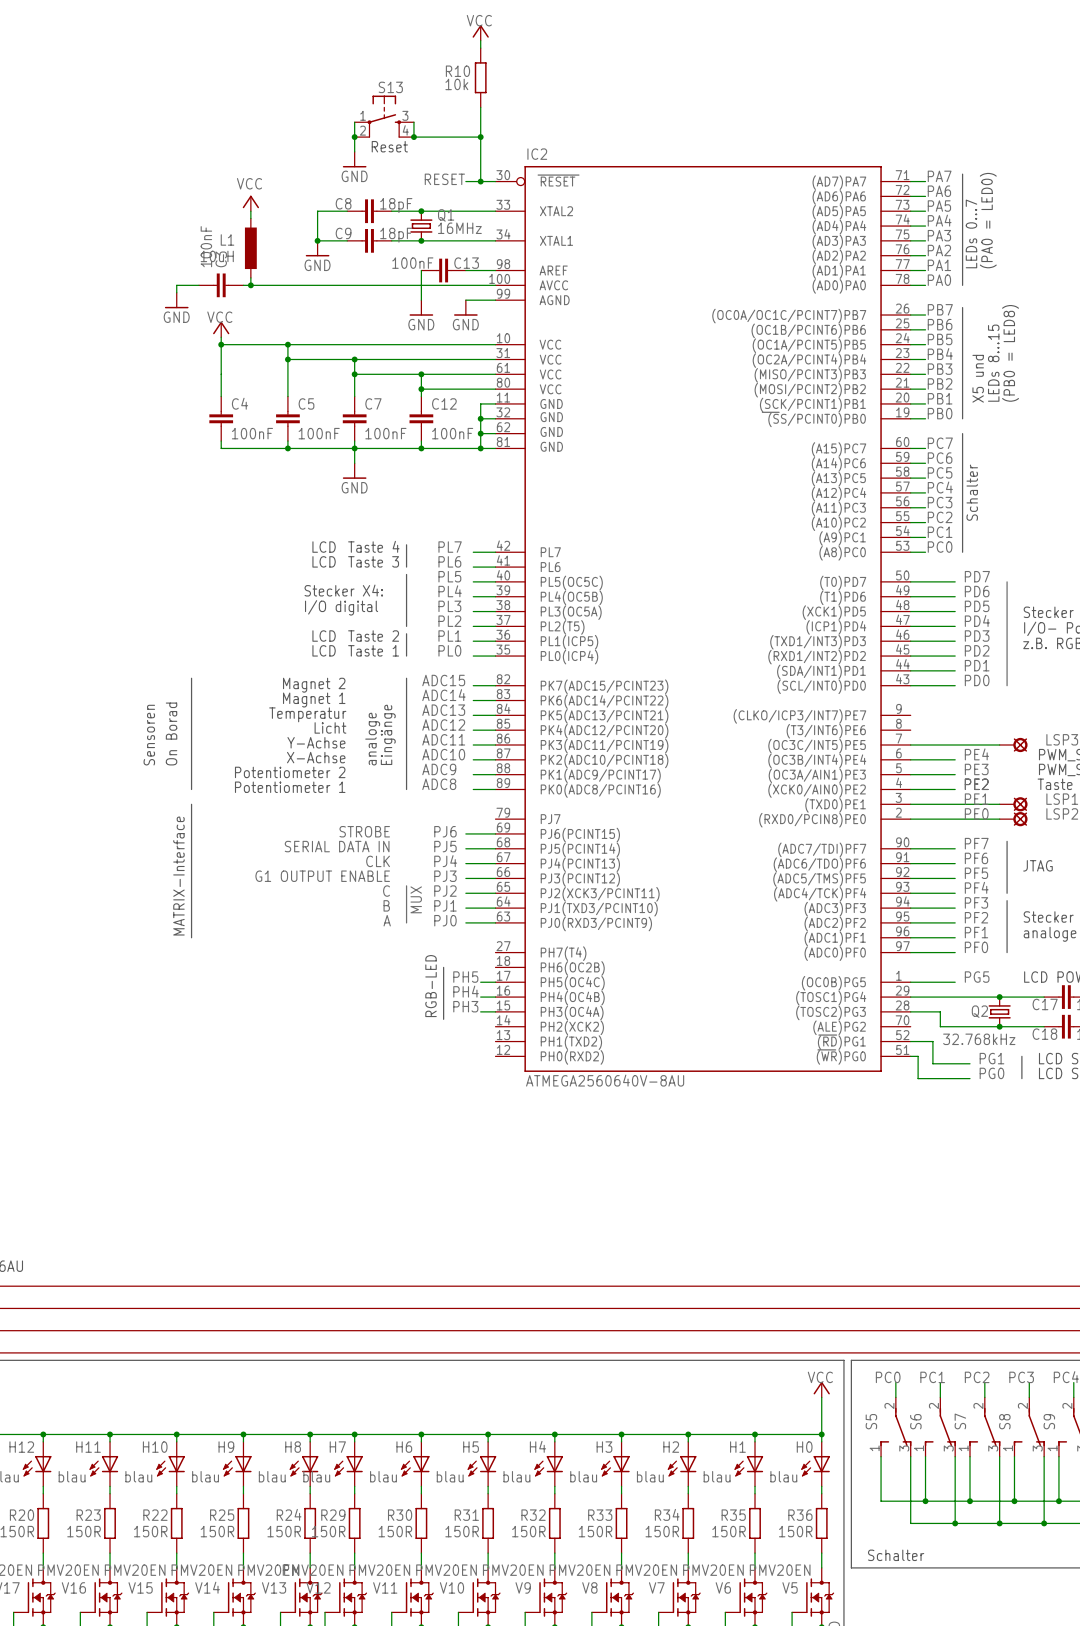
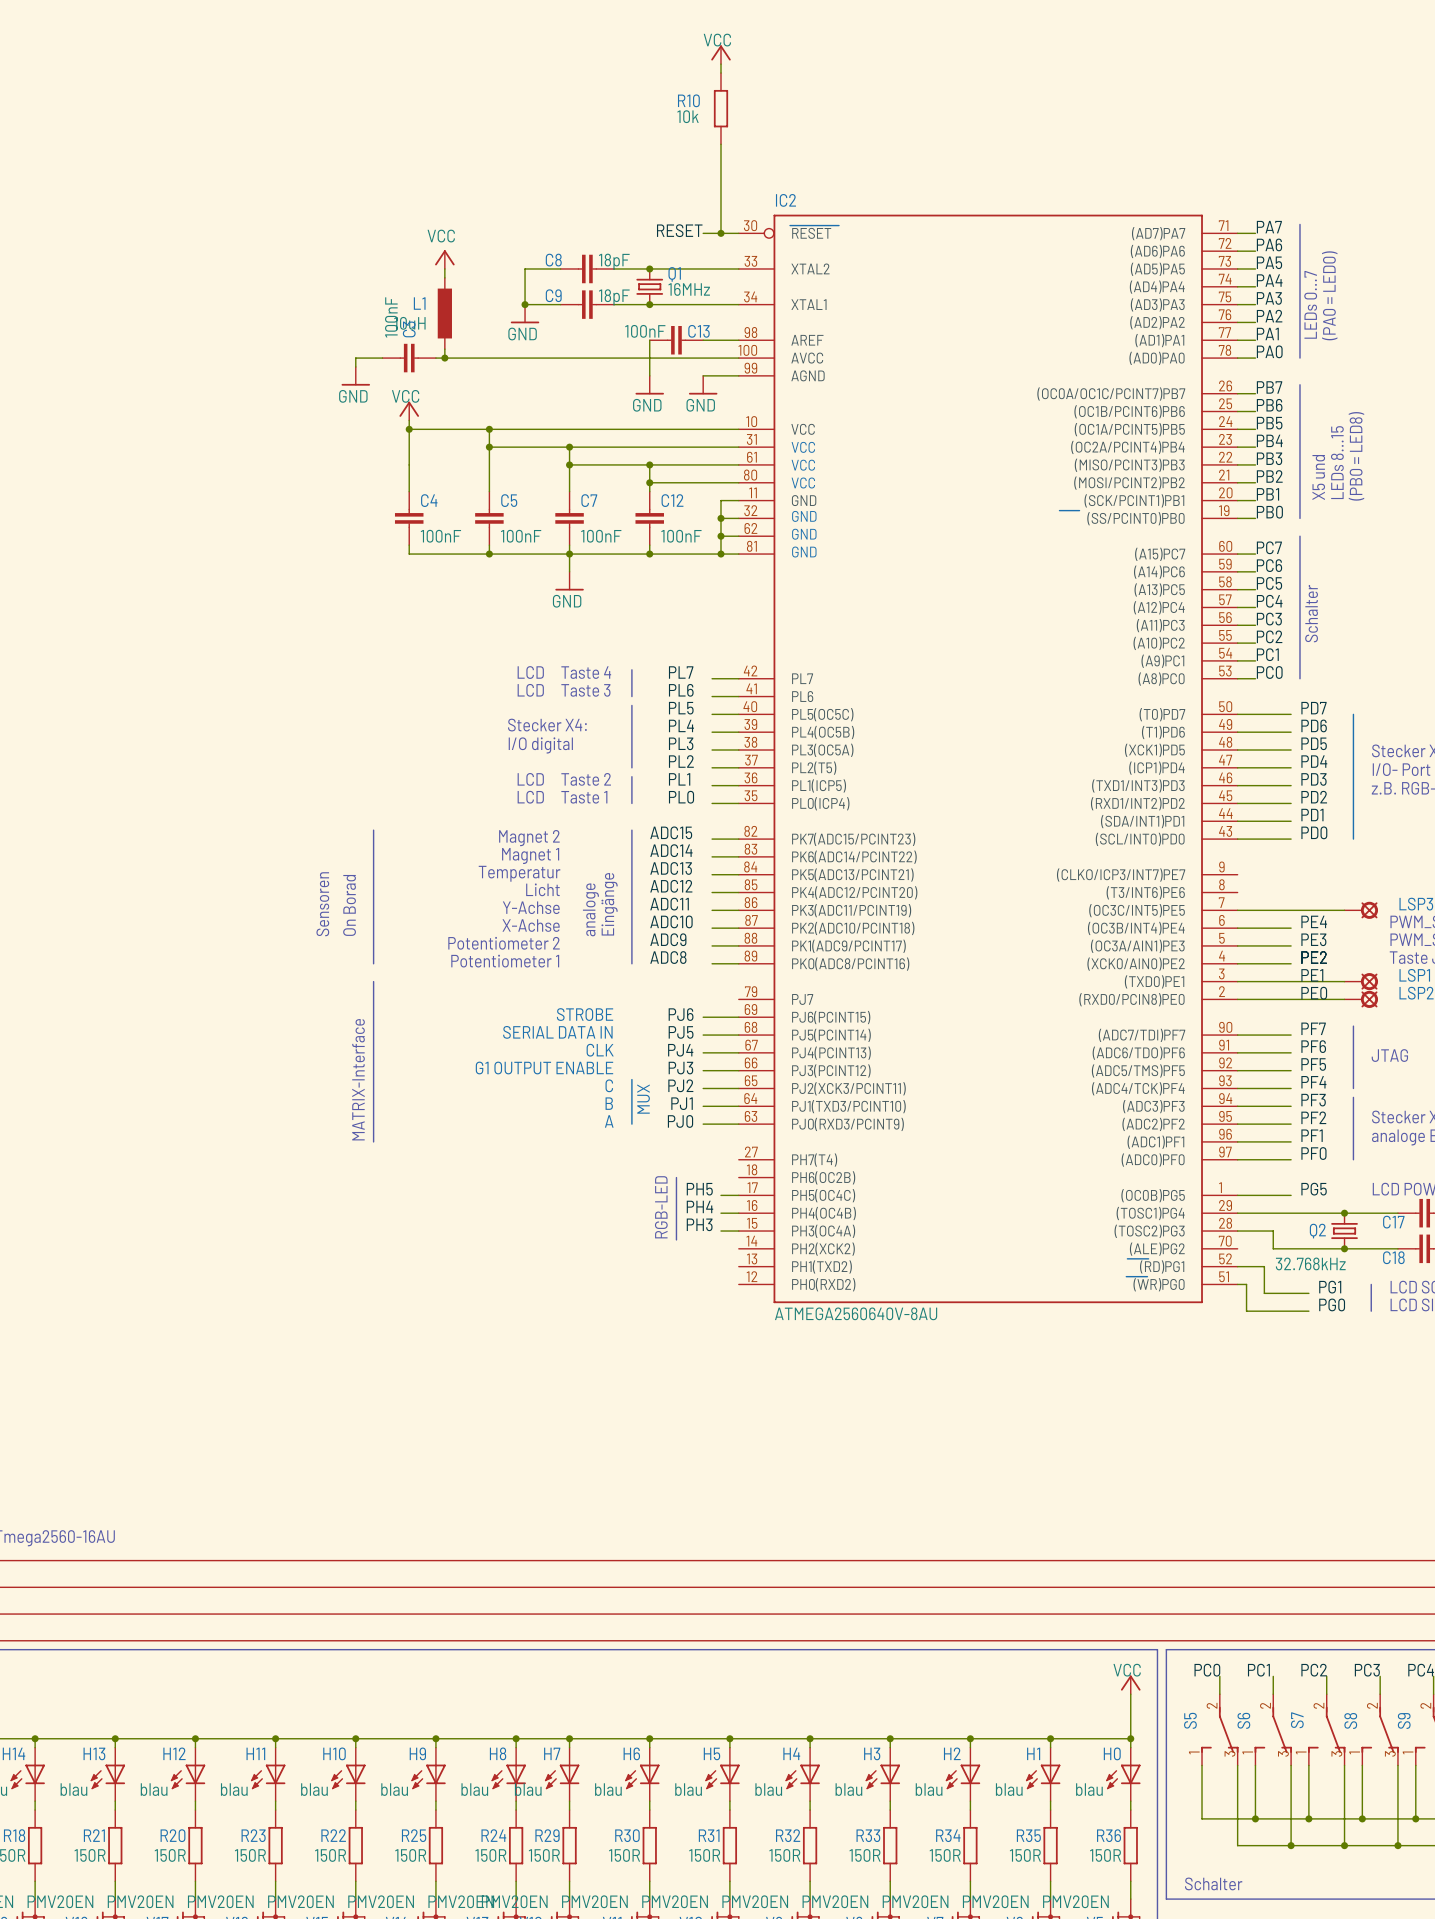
S13: (384, 116) -> none
wire: (354, 122) (354, 151) -> none
wire: (413, 122) (413, 137) (480, 137) -> none
junction: (354, 137) -> none
junction: (413, 137) -> none
junction: (480, 137) -> none
text: Reset (389, 146) -> none
power symbol: GND (354, 159) -> none

